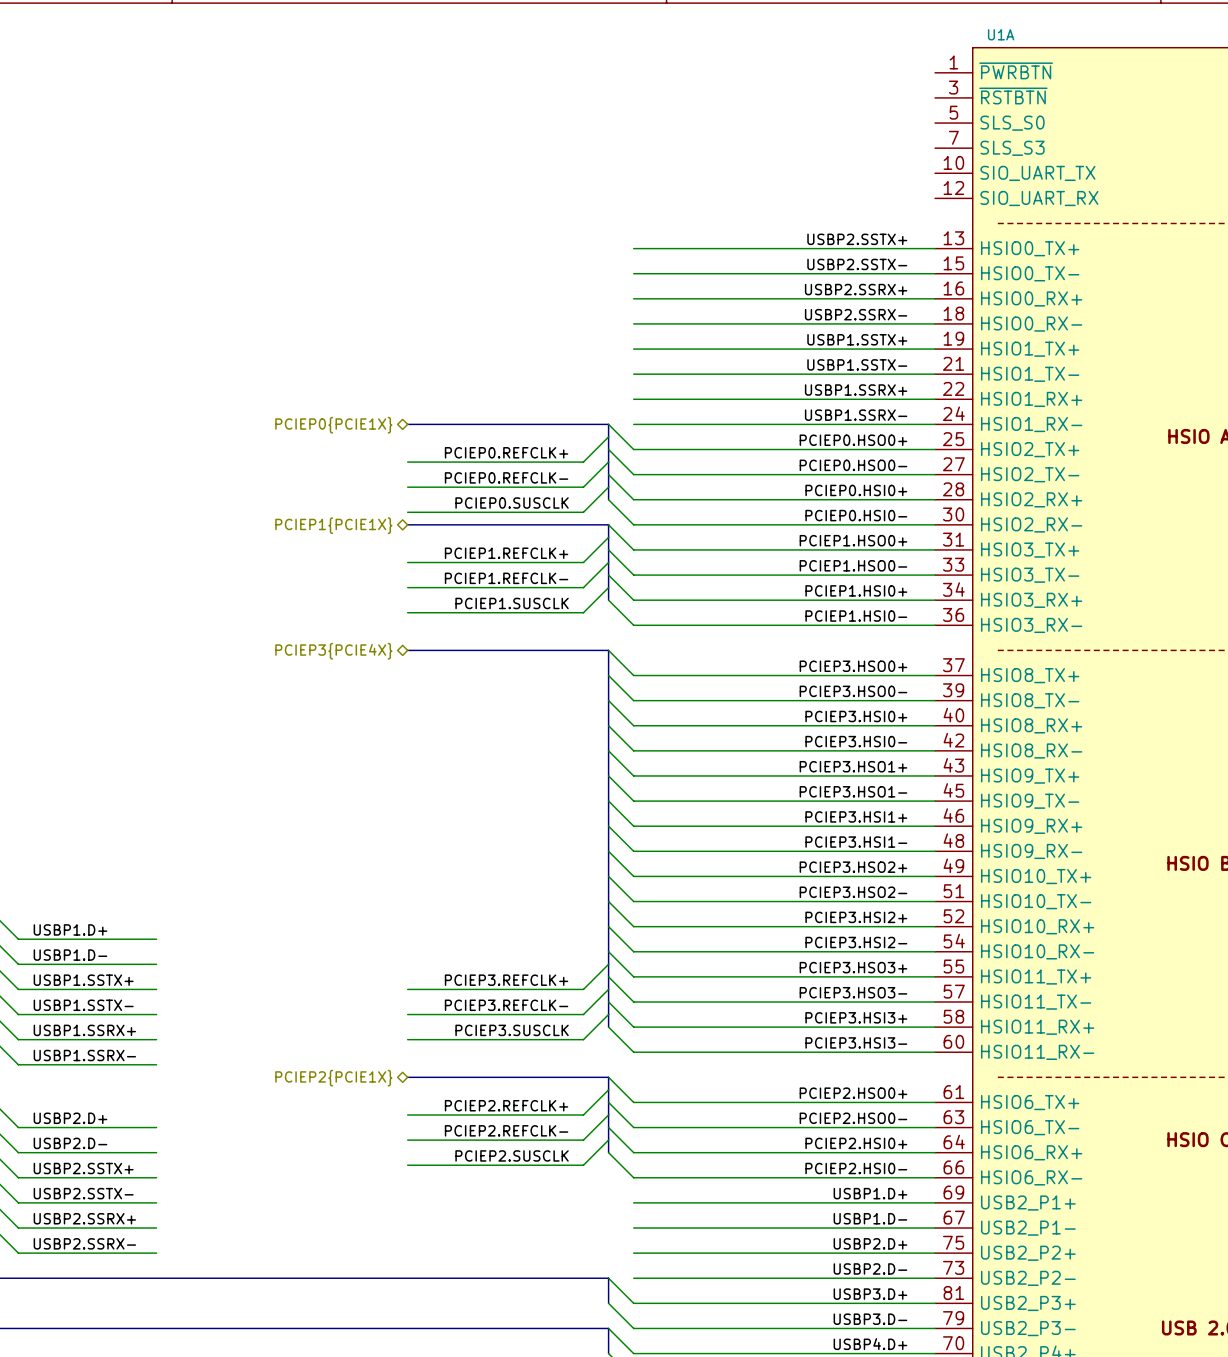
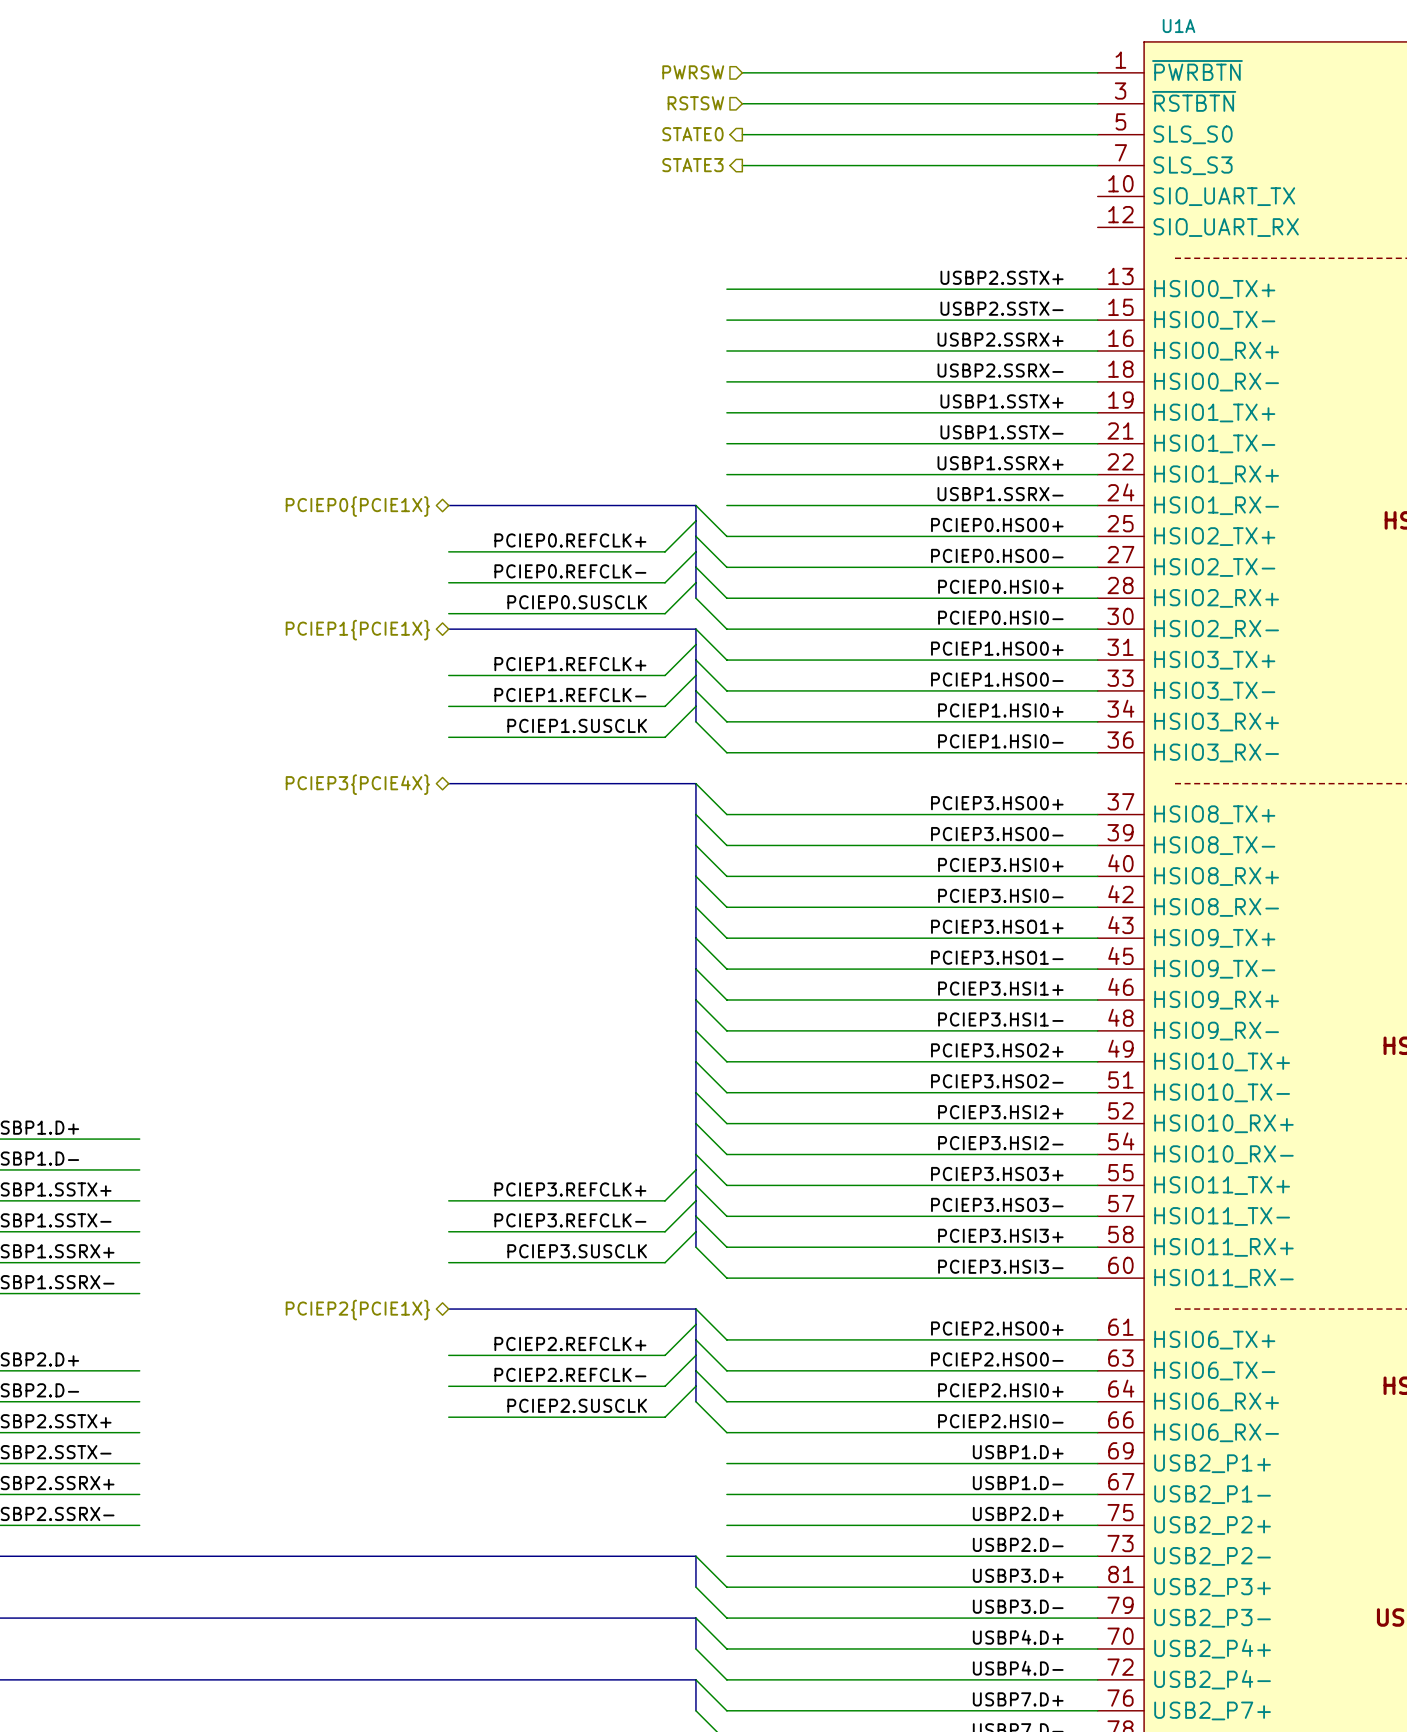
hierarchical label: none -> PWRSW (693, 72)
wire: none -> (742, 72) (1097, 72)
hierarchical label: none -> RSTSW (695, 103)
wire: none -> (742, 103) (1097, 103)
hierarchical label: none -> STATE0 (692, 134)
wire: none -> (742, 134) (1097, 134)
hierarchical label: none -> STATE3 (692, 165)
wire: none -> (742, 165) (1097, 165)

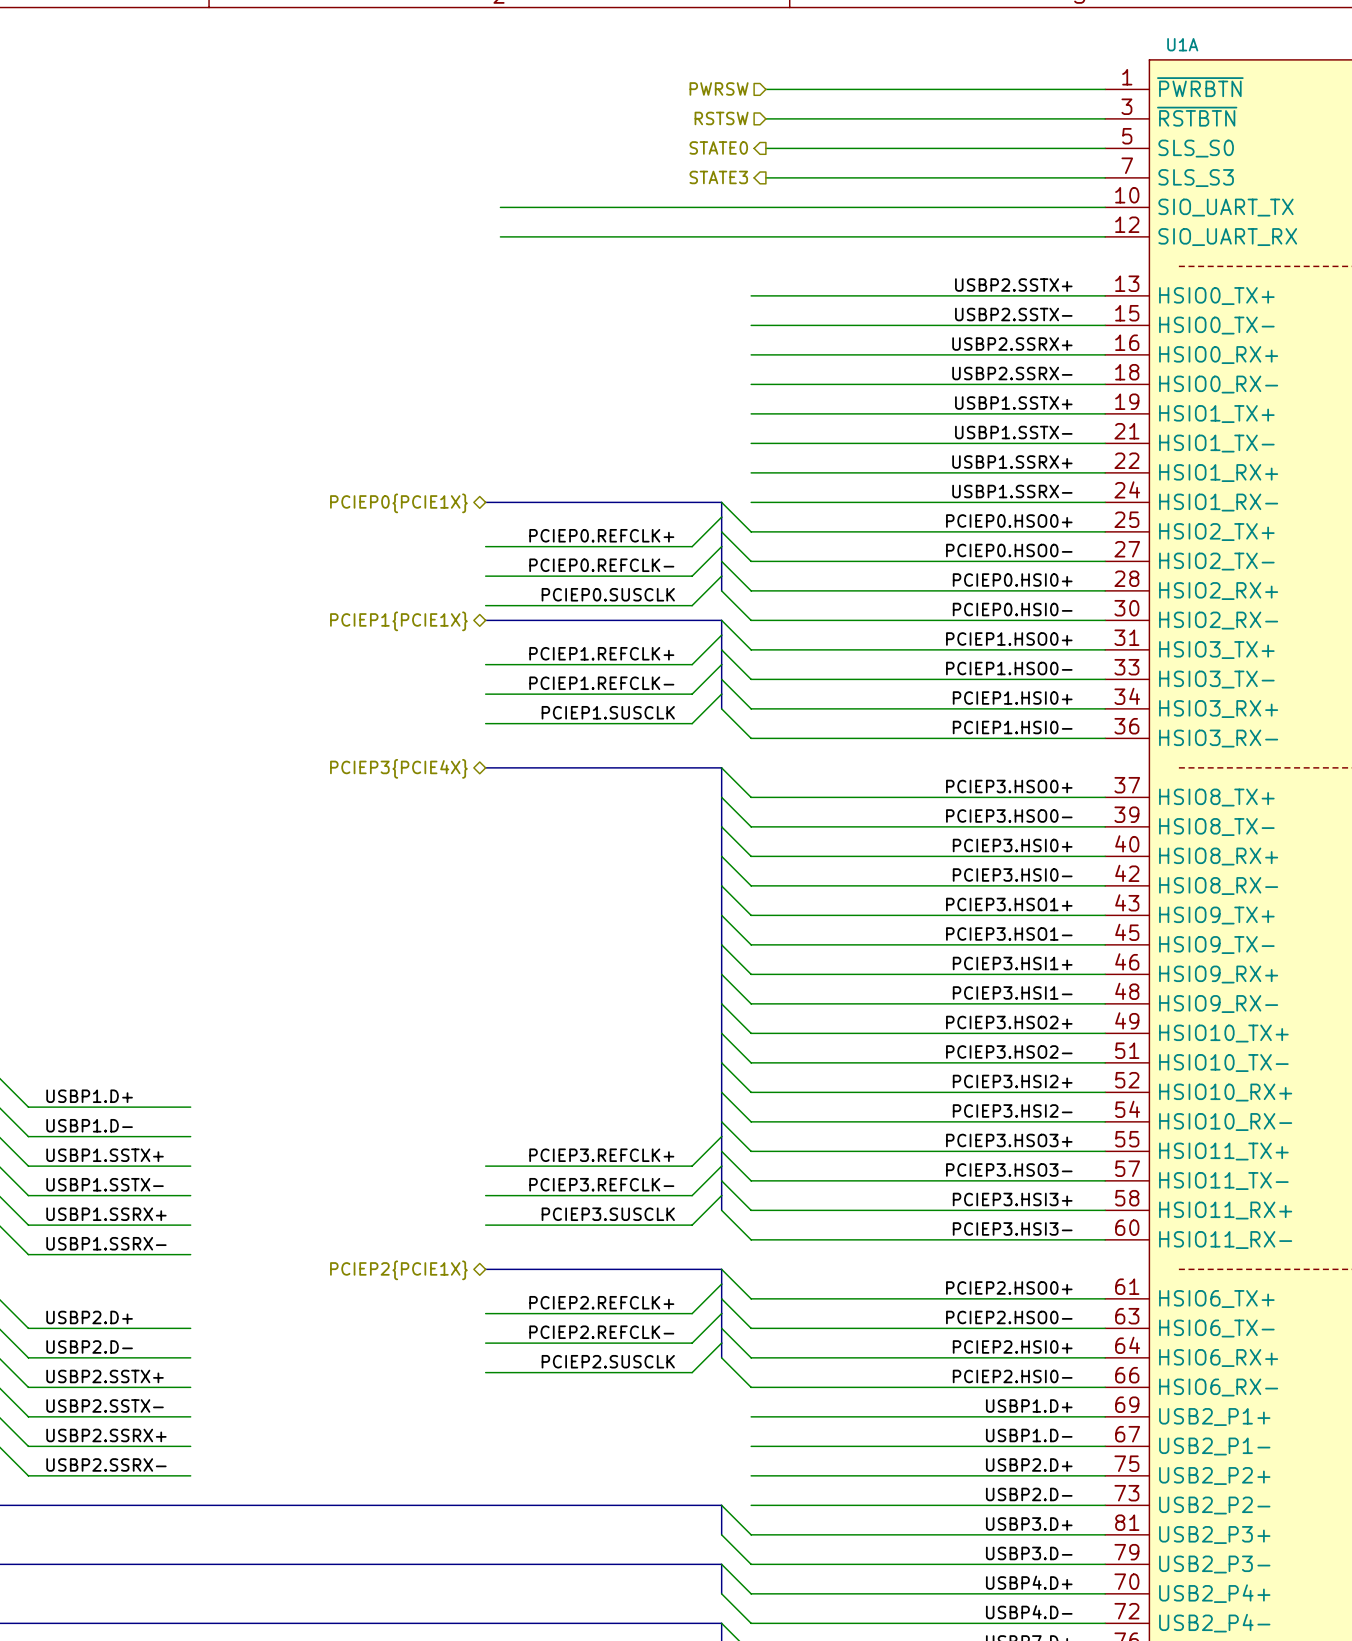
wire: none -> (500, 207) (1105, 207)
wire: none -> (500, 236) (1105, 236)

